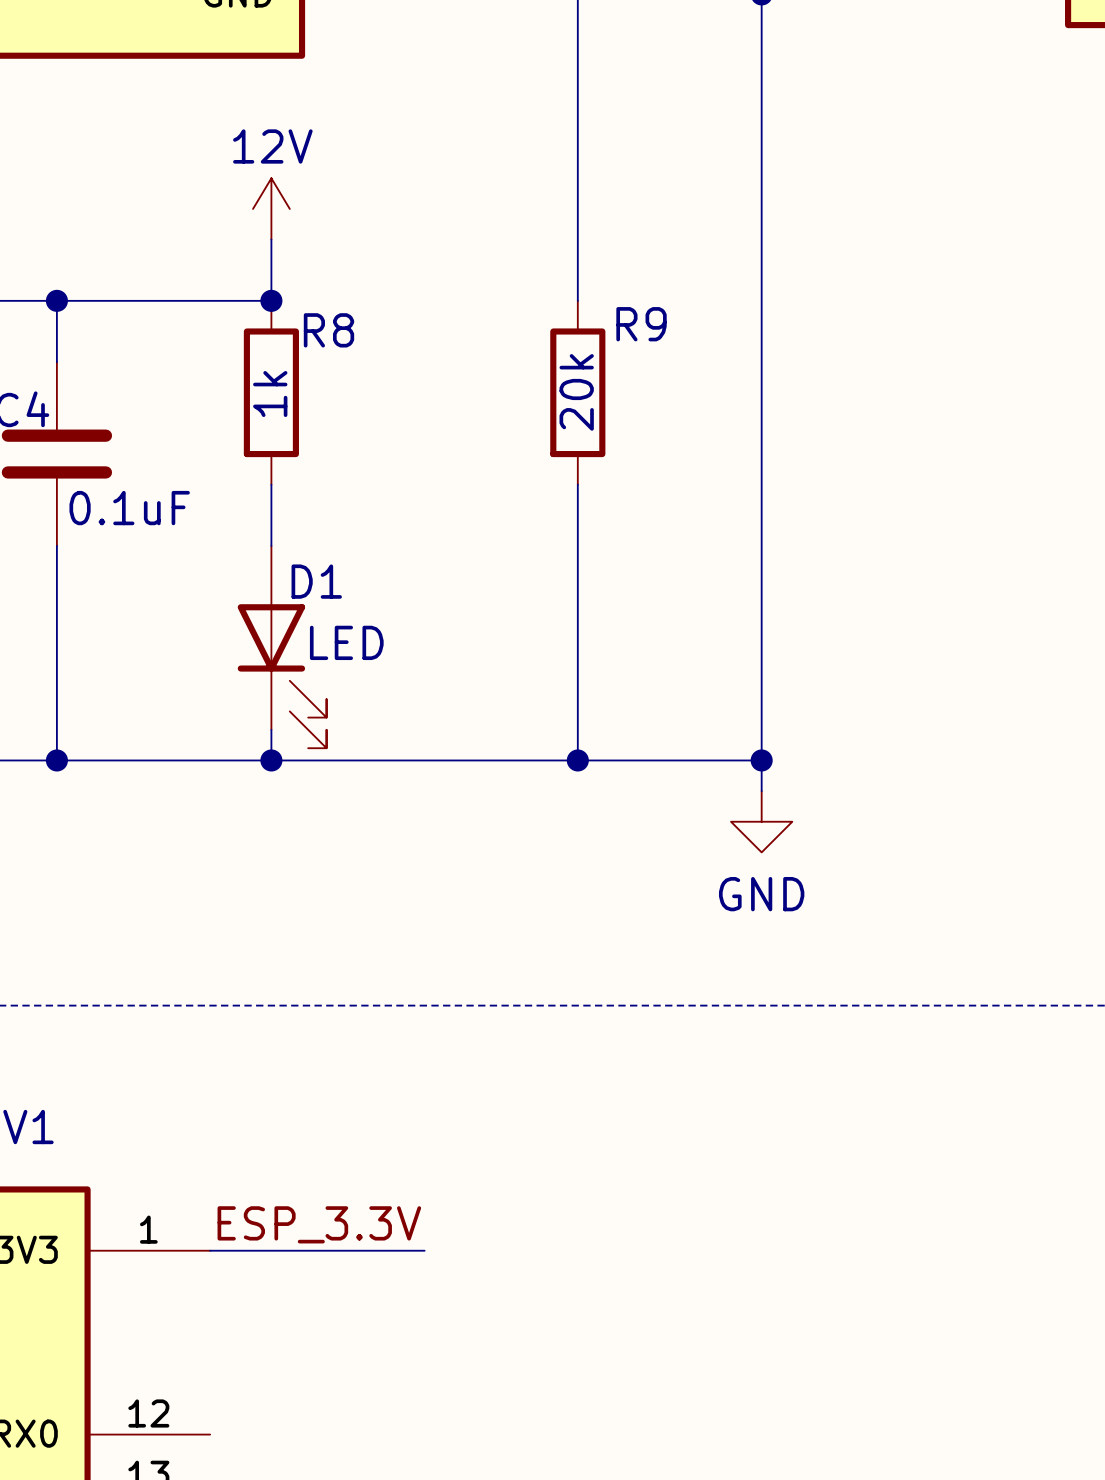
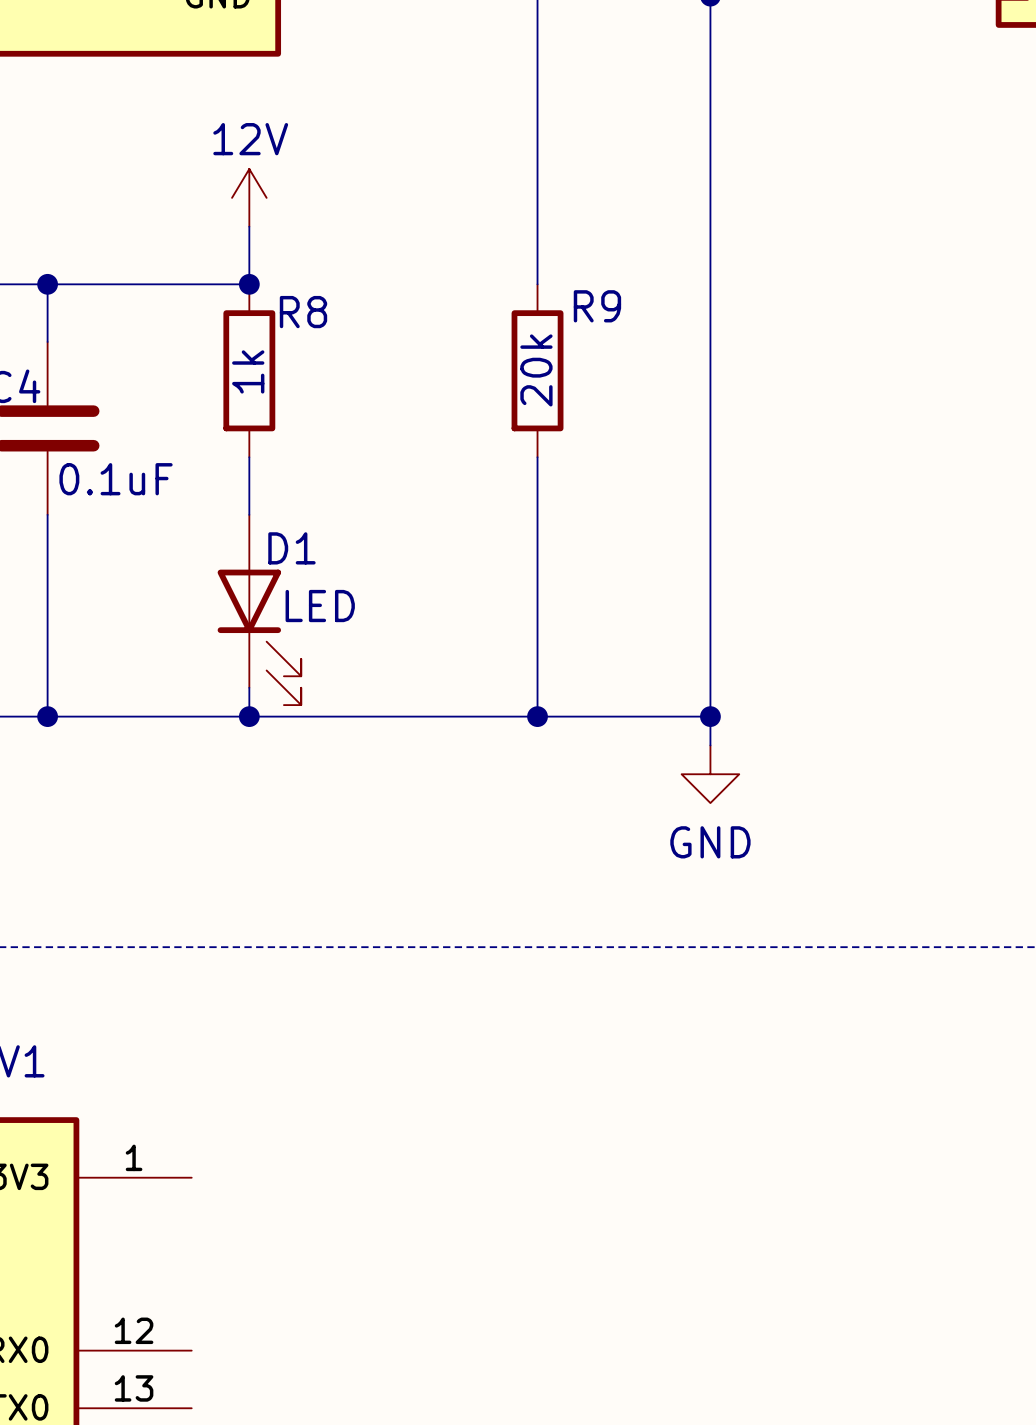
label: ESP_3.3V (319, 1224) -> none
wire: (210, 1250) (424, 1250) -> none

